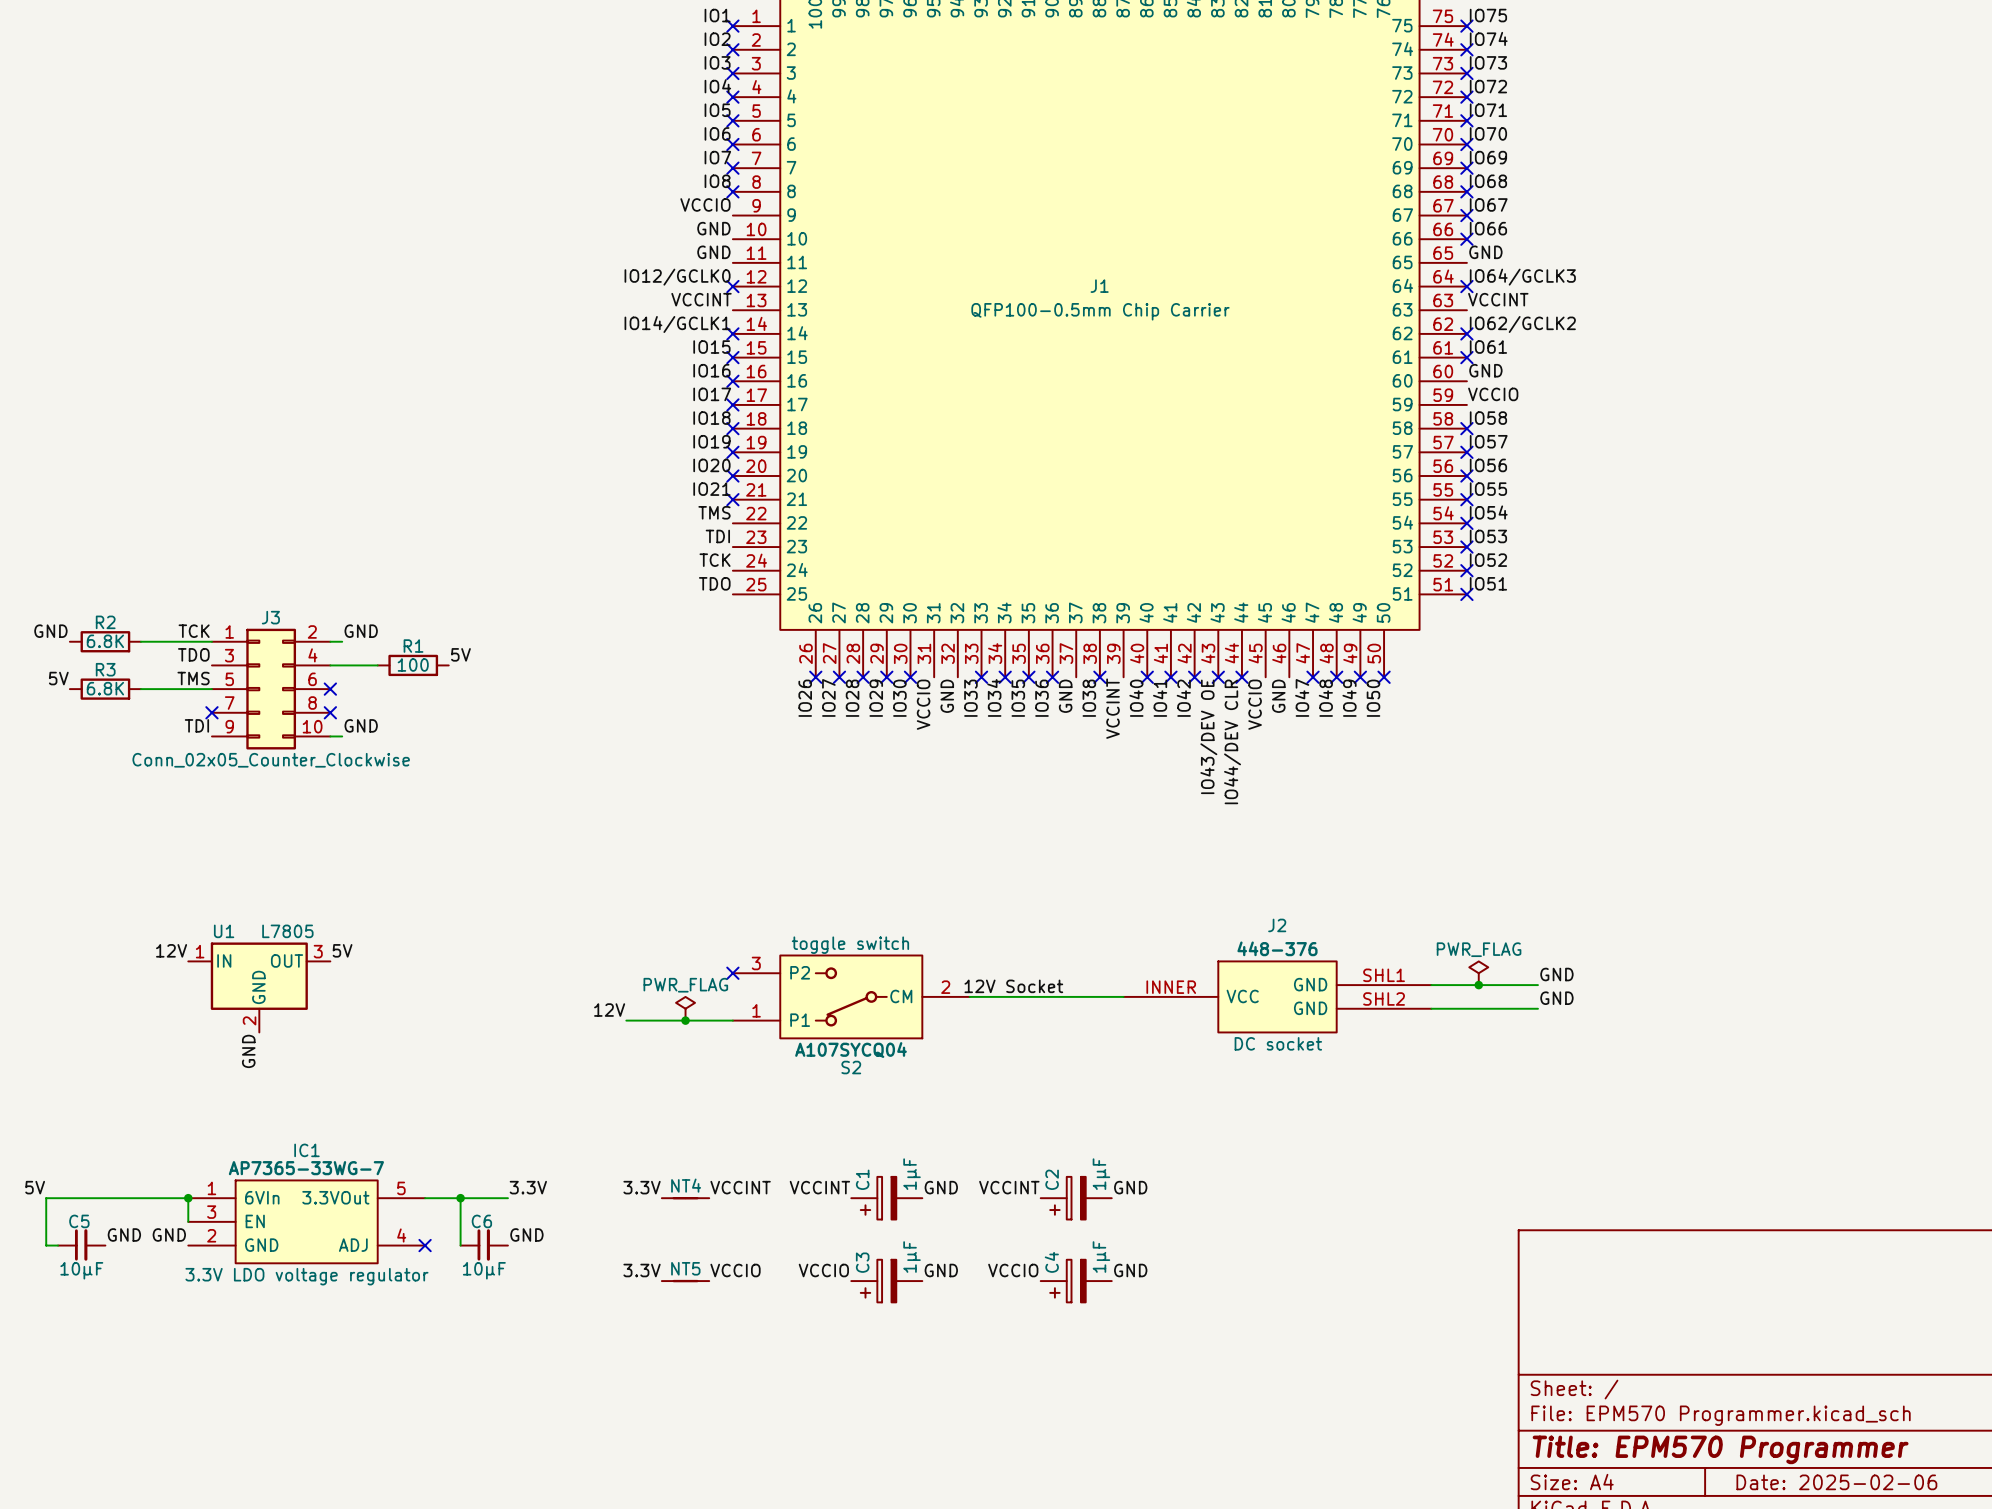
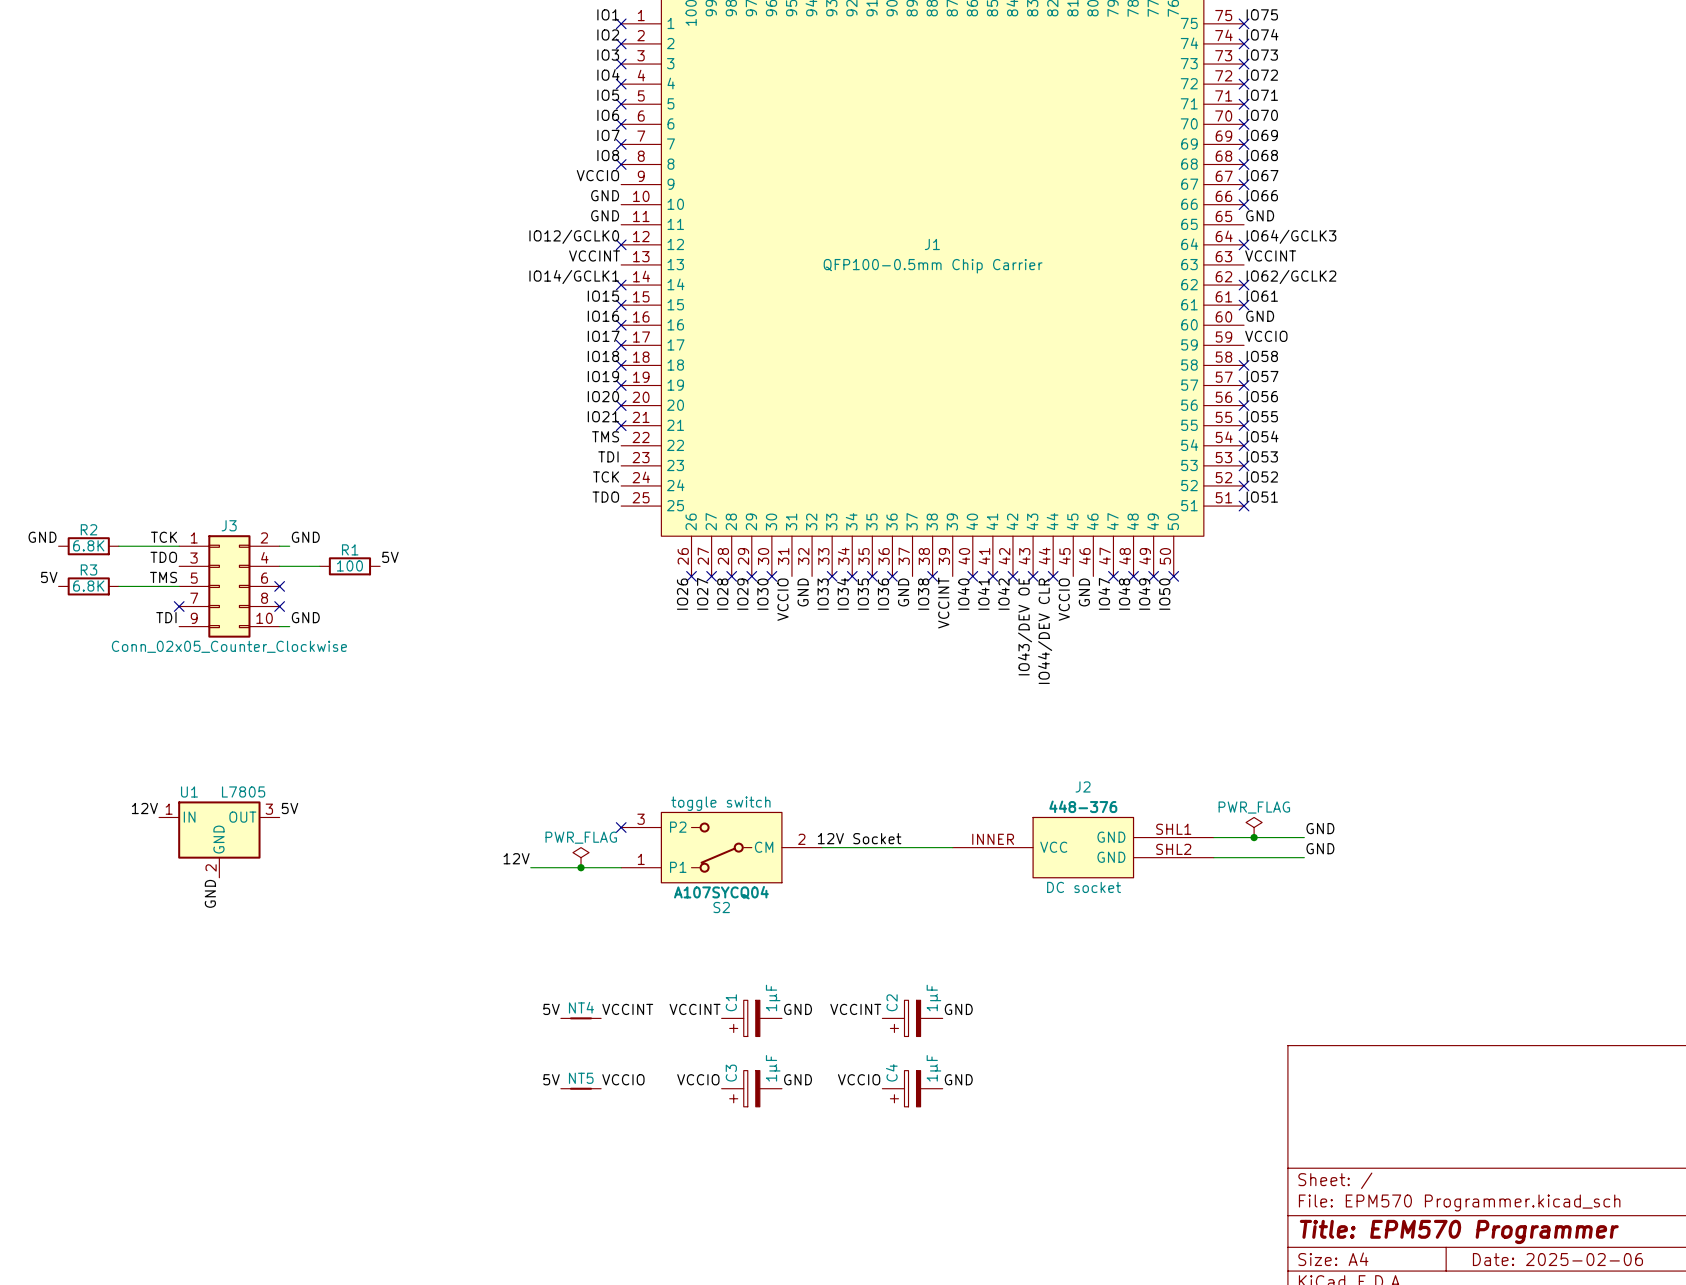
label: 5V (35, 1187) -> none
label: 3.3V (528, 1187) -> none
label: 3.3V (642, 1187) -> 5V (551, 1009)
junction: (188, 1198) -> none
wire: (425, 1198) (507, 1198) -> none
wire: (460, 1198) (460, 1245) -> none
junction: (460, 1198) -> none
wire: (188, 1221) (188, 1198) (46, 1198) (46, 1245) (58, 1245) -> none
IC1: AP7365-33WG-7 (306, 1221) -> none
label: GND (124, 1234) -> none
label: GND (169, 1234) -> none
label: GND (526, 1234) -> none
C5: 10µF (81, 1244) -> none
C6: 10µF (484, 1244) -> none
no-connect mark: (425, 1245) -> none
label: 3.3V (642, 1270) -> 5V (551, 1079)

